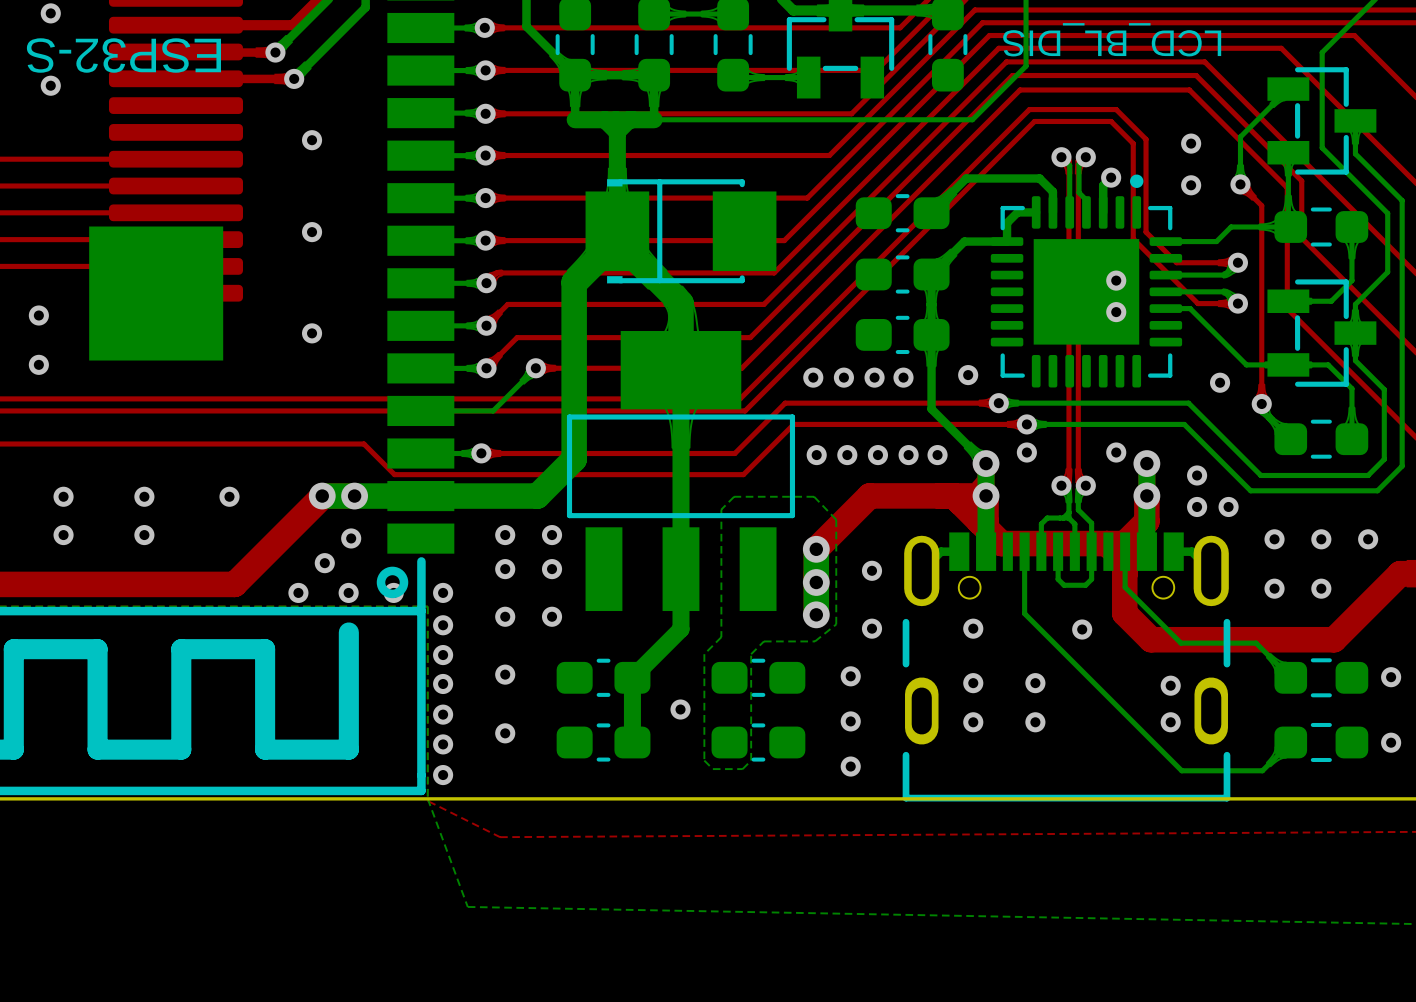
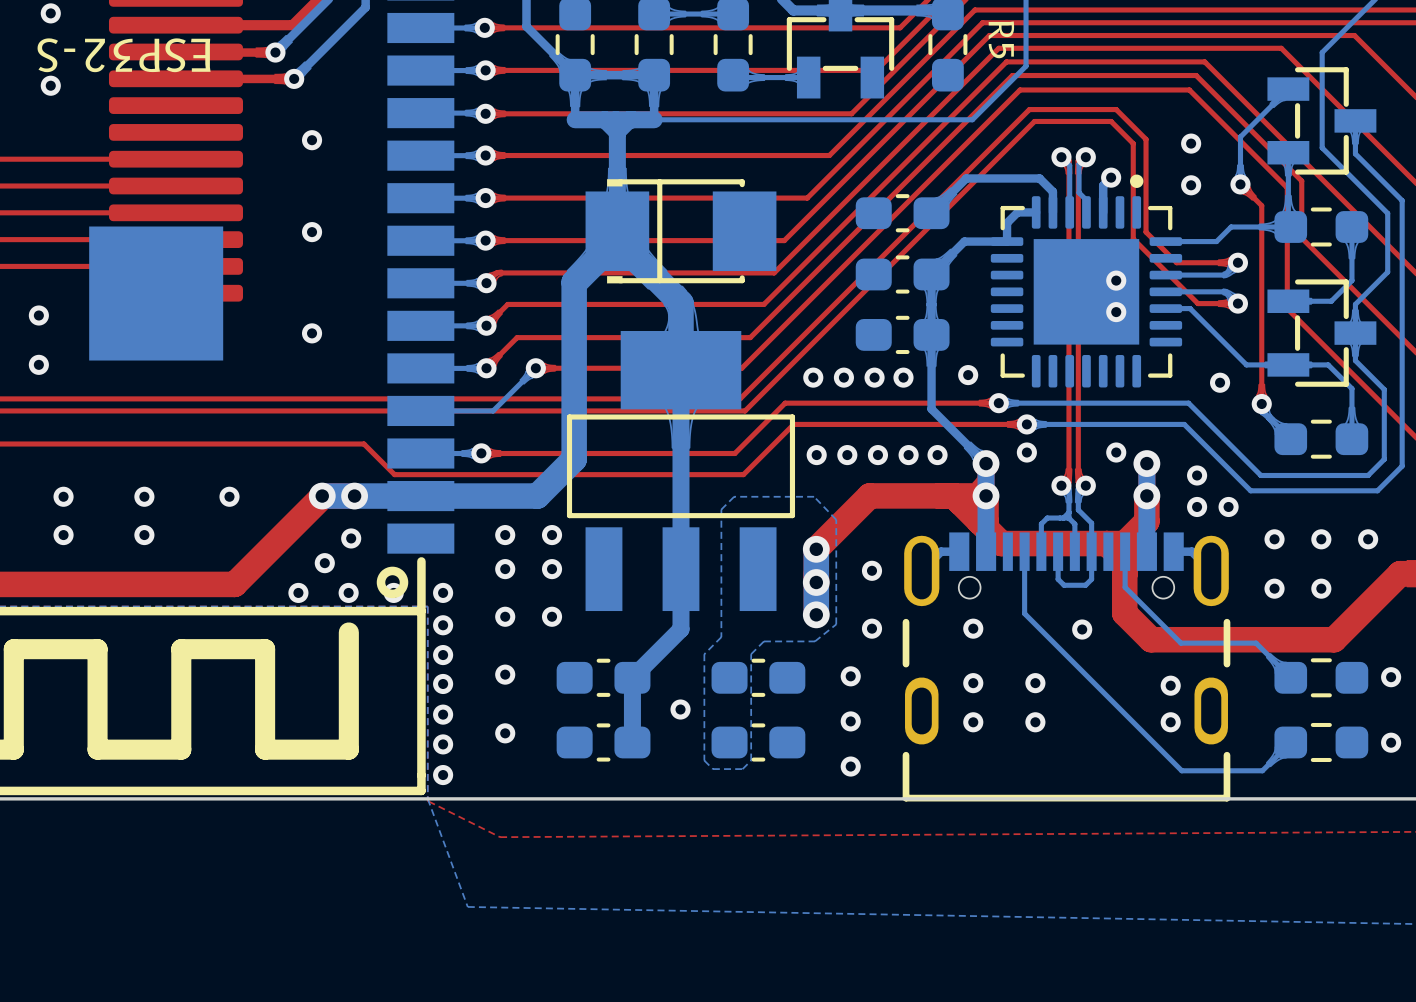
text: LCD_BL_DIS (1112, 39) -> none
text: none -> R5 (1001, 39)

